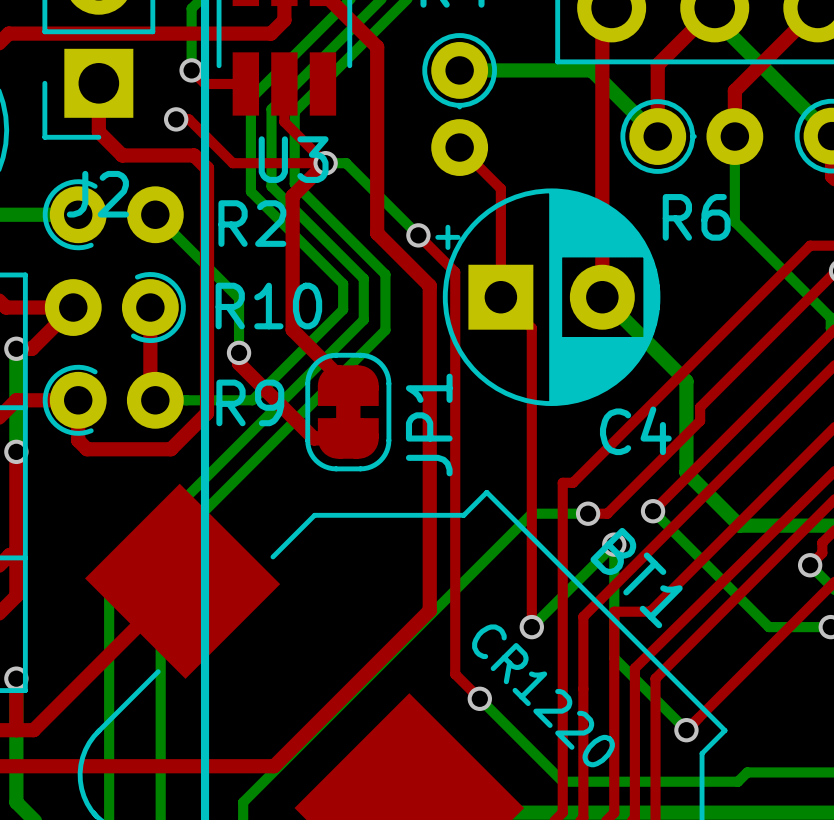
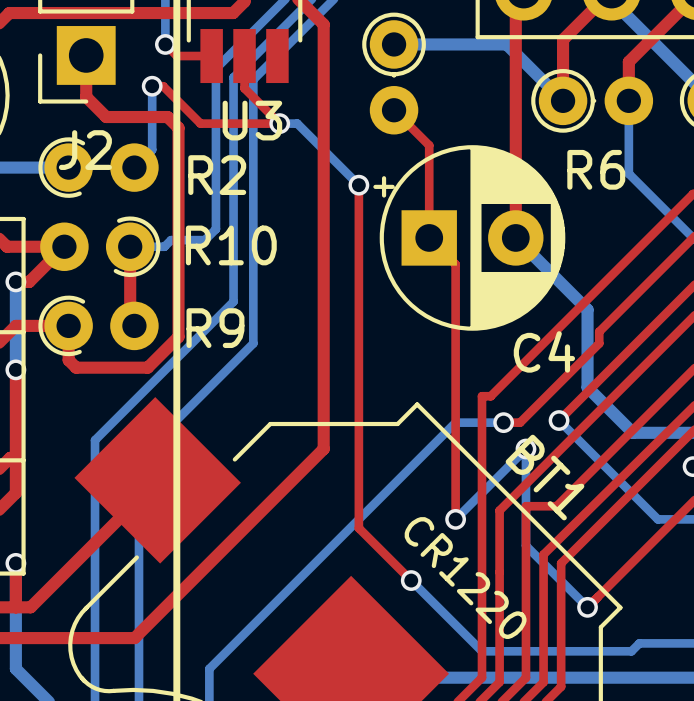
top track: (325, 163) (292, 196) (292, 330) (348, 385) -> none
bottom track: (294, 183) (385, 274) (385, 330) (294, 420) -> (253, 141) (253, 343)
bottom track: (271, 186) (363, 278) (363, 319) (109, 574) -> (233, 143) (233, 301) (95, 440) (95, 474)
bottom track: (250, 191) (343, 283) (343, 309) (252, 400) (155, 400) -> (215, 147) (215, 229) (204, 240) (171, 240) (164, 246) (130, 246)
bottom track: (155, 214) (239, 298) (239, 352) -> (134, 167) (152, 149) (152, 86)
top track: (377, 233) (429, 285) (429, 610) (274, 766) (155, 766) -> (323, 183) (323, 449) (134, 638)
top track: (418, 235) (455, 272) (455, 674) -> (358, 185) (358, 528) (390, 559)
top track: (239, 352) (239, 363) (313, 438) (348, 438) -> none
via: (239, 352) -> none
JP1: (348, 412) -> none

